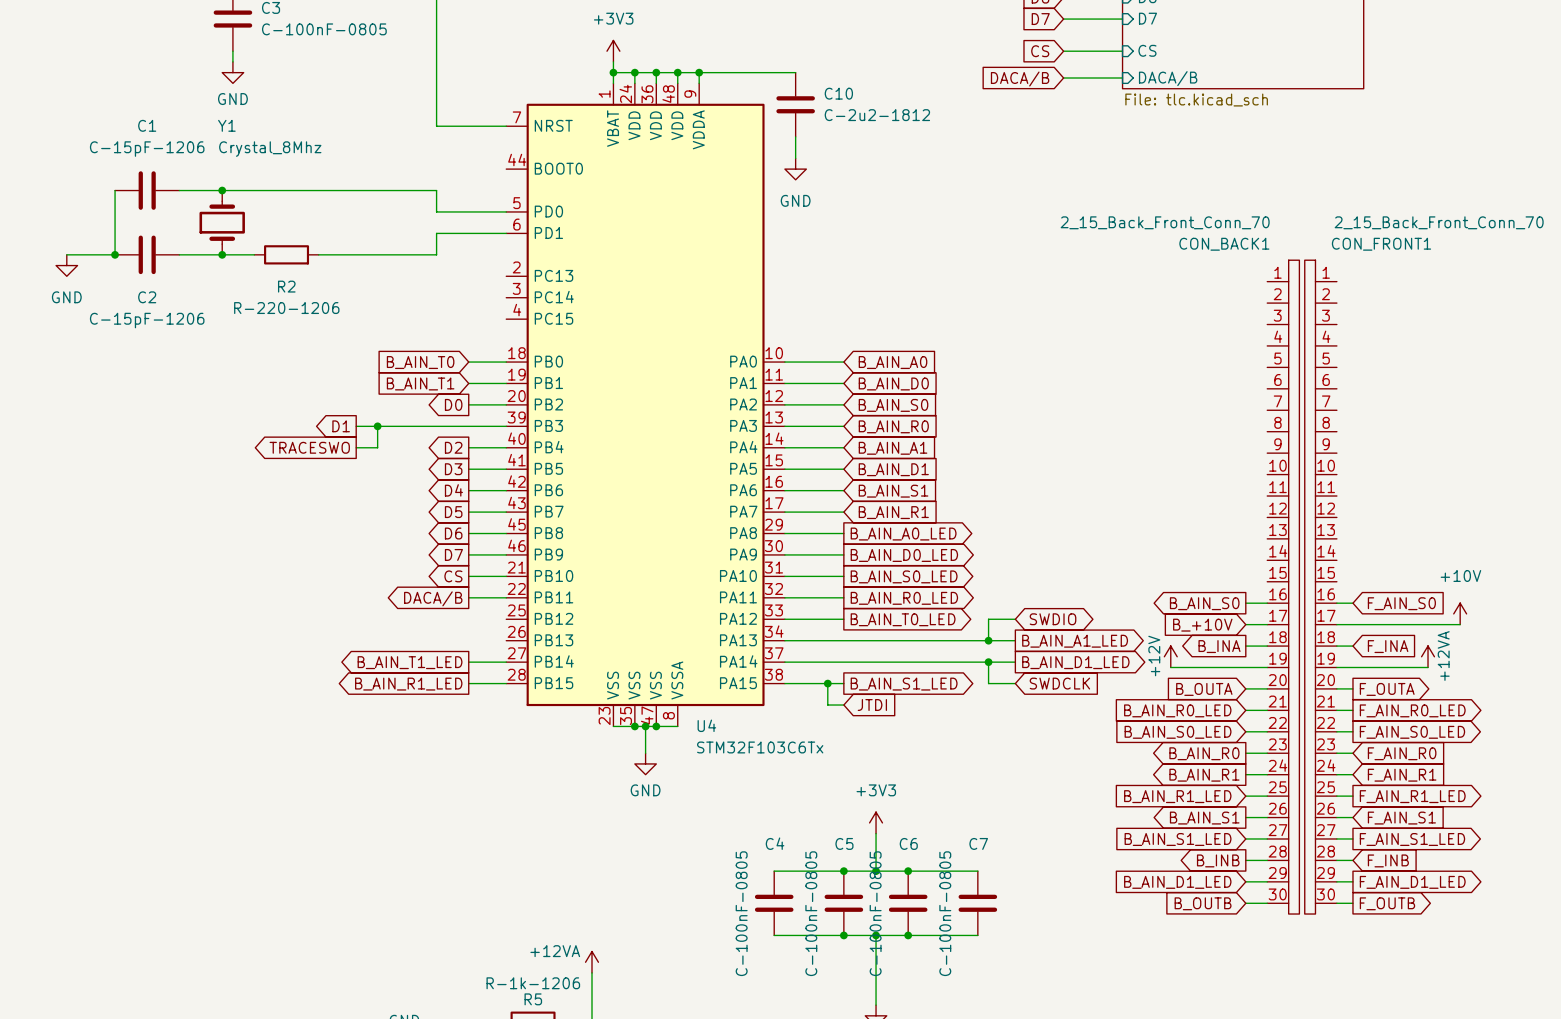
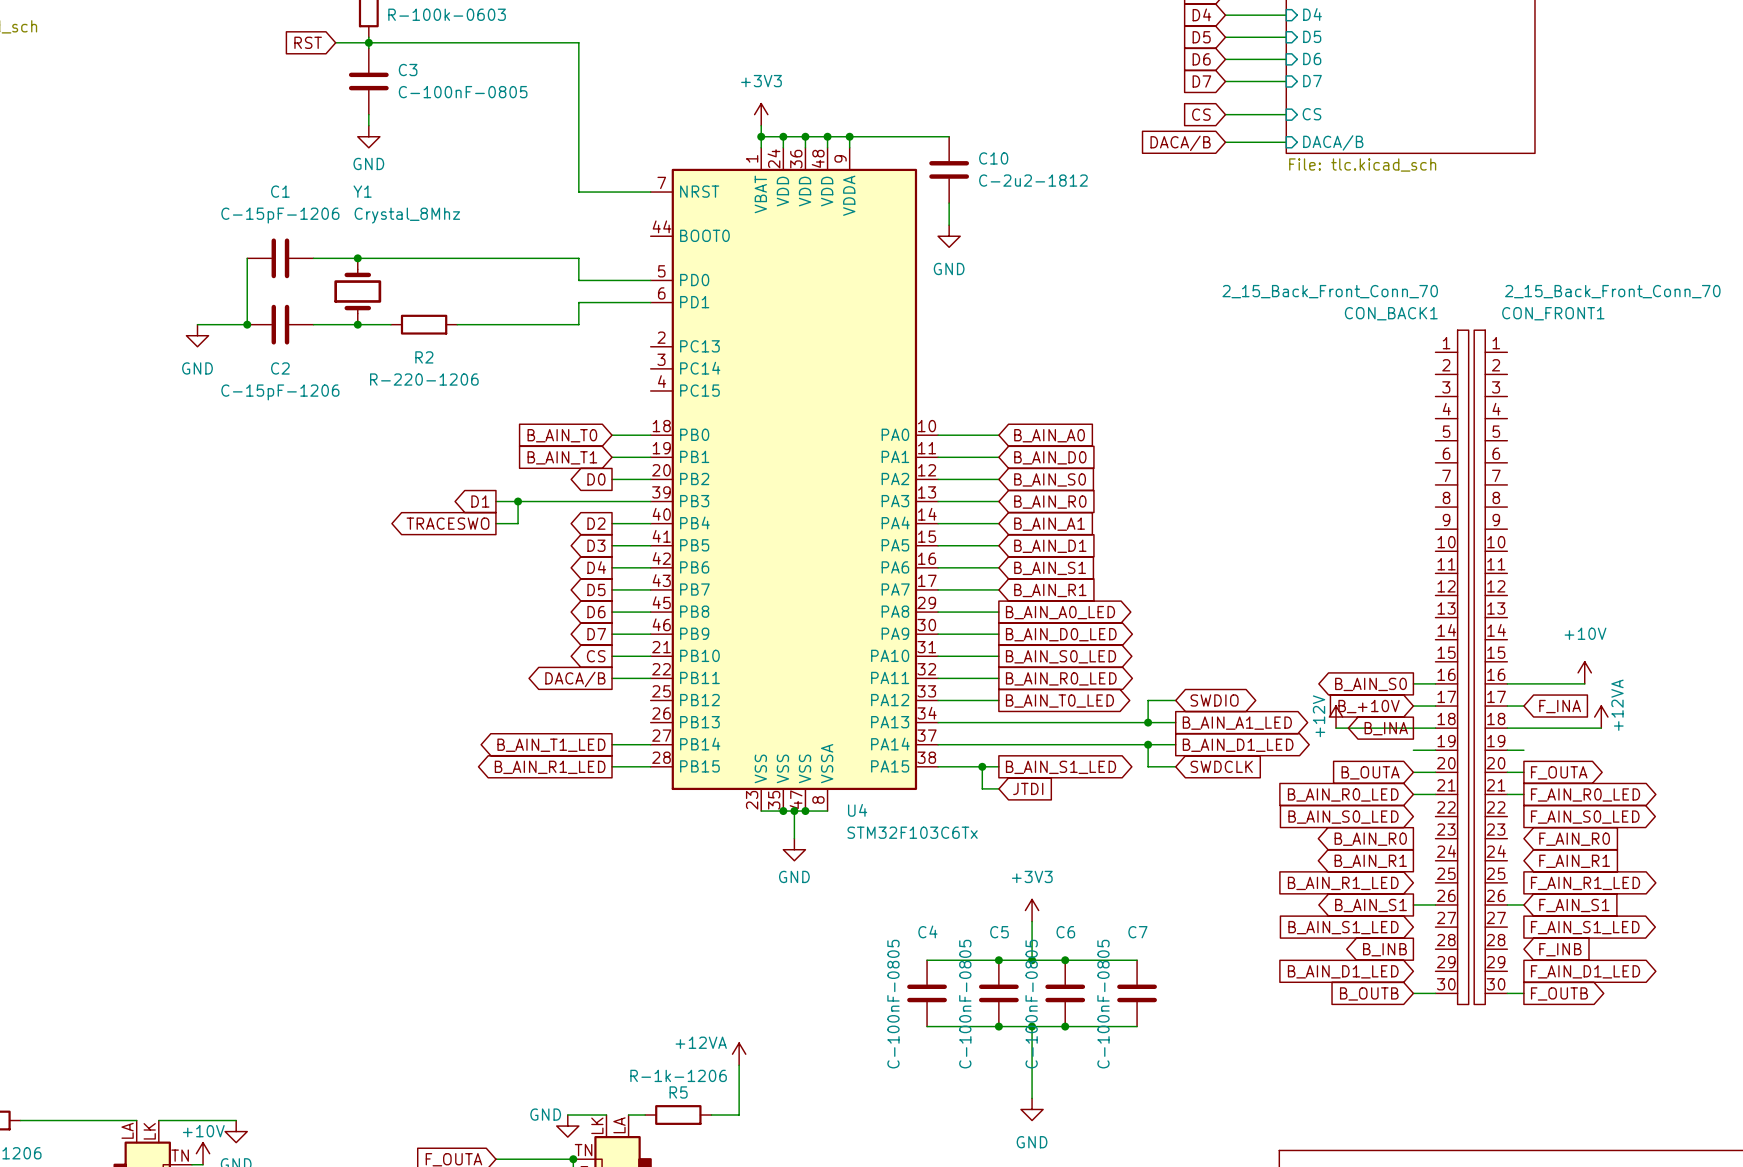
wire: none -> (1523, 683) (1584, 683)
global label: F_AIN_S0 (1401, 603) -> none
power symbol position: +10V (1460, 613) -> +10V (1584, 672)
wire: (1352, 624) (1460, 624) -> none
global label position: F_INA (1388, 646) -> F_INA (1560, 706)
power symbol position: +12V (1170, 656) -> +12V (1336, 717)
power symbol position: +12VA (1428, 656) -> +12VA (1601, 717)
power symbol text position: +12VA (1443, 656) -> +12VA (1617, 705)
wire: (1170, 667) (1245, 667) -> (1336, 728) (1413, 728)
wire: (1352, 667) (1428, 667) -> (1523, 728) (1601, 728)
wire: (1245, 731) (1267, 731) -> none
wire: (1336, 731) (1352, 731) -> none
wire: (1245, 753) (1267, 753) -> none
wire: (1336, 753) (1352, 753) -> none
wire: (1245, 774) (1267, 774) -> none
wire: (1336, 774) (1352, 774) -> none
wire: (1245, 796) (1267, 796) -> none
wire: (1336, 796) (1352, 796) -> none
wire: (1245, 838) (1267, 838) -> none
wire: (1336, 838) (1352, 838) -> none
wire: (1245, 860) (1267, 860) -> none
wire: (1336, 860) (1352, 860) -> none
wire: (1245, 881) (1267, 881) -> none
wire: (1336, 881) (1352, 881) -> none

